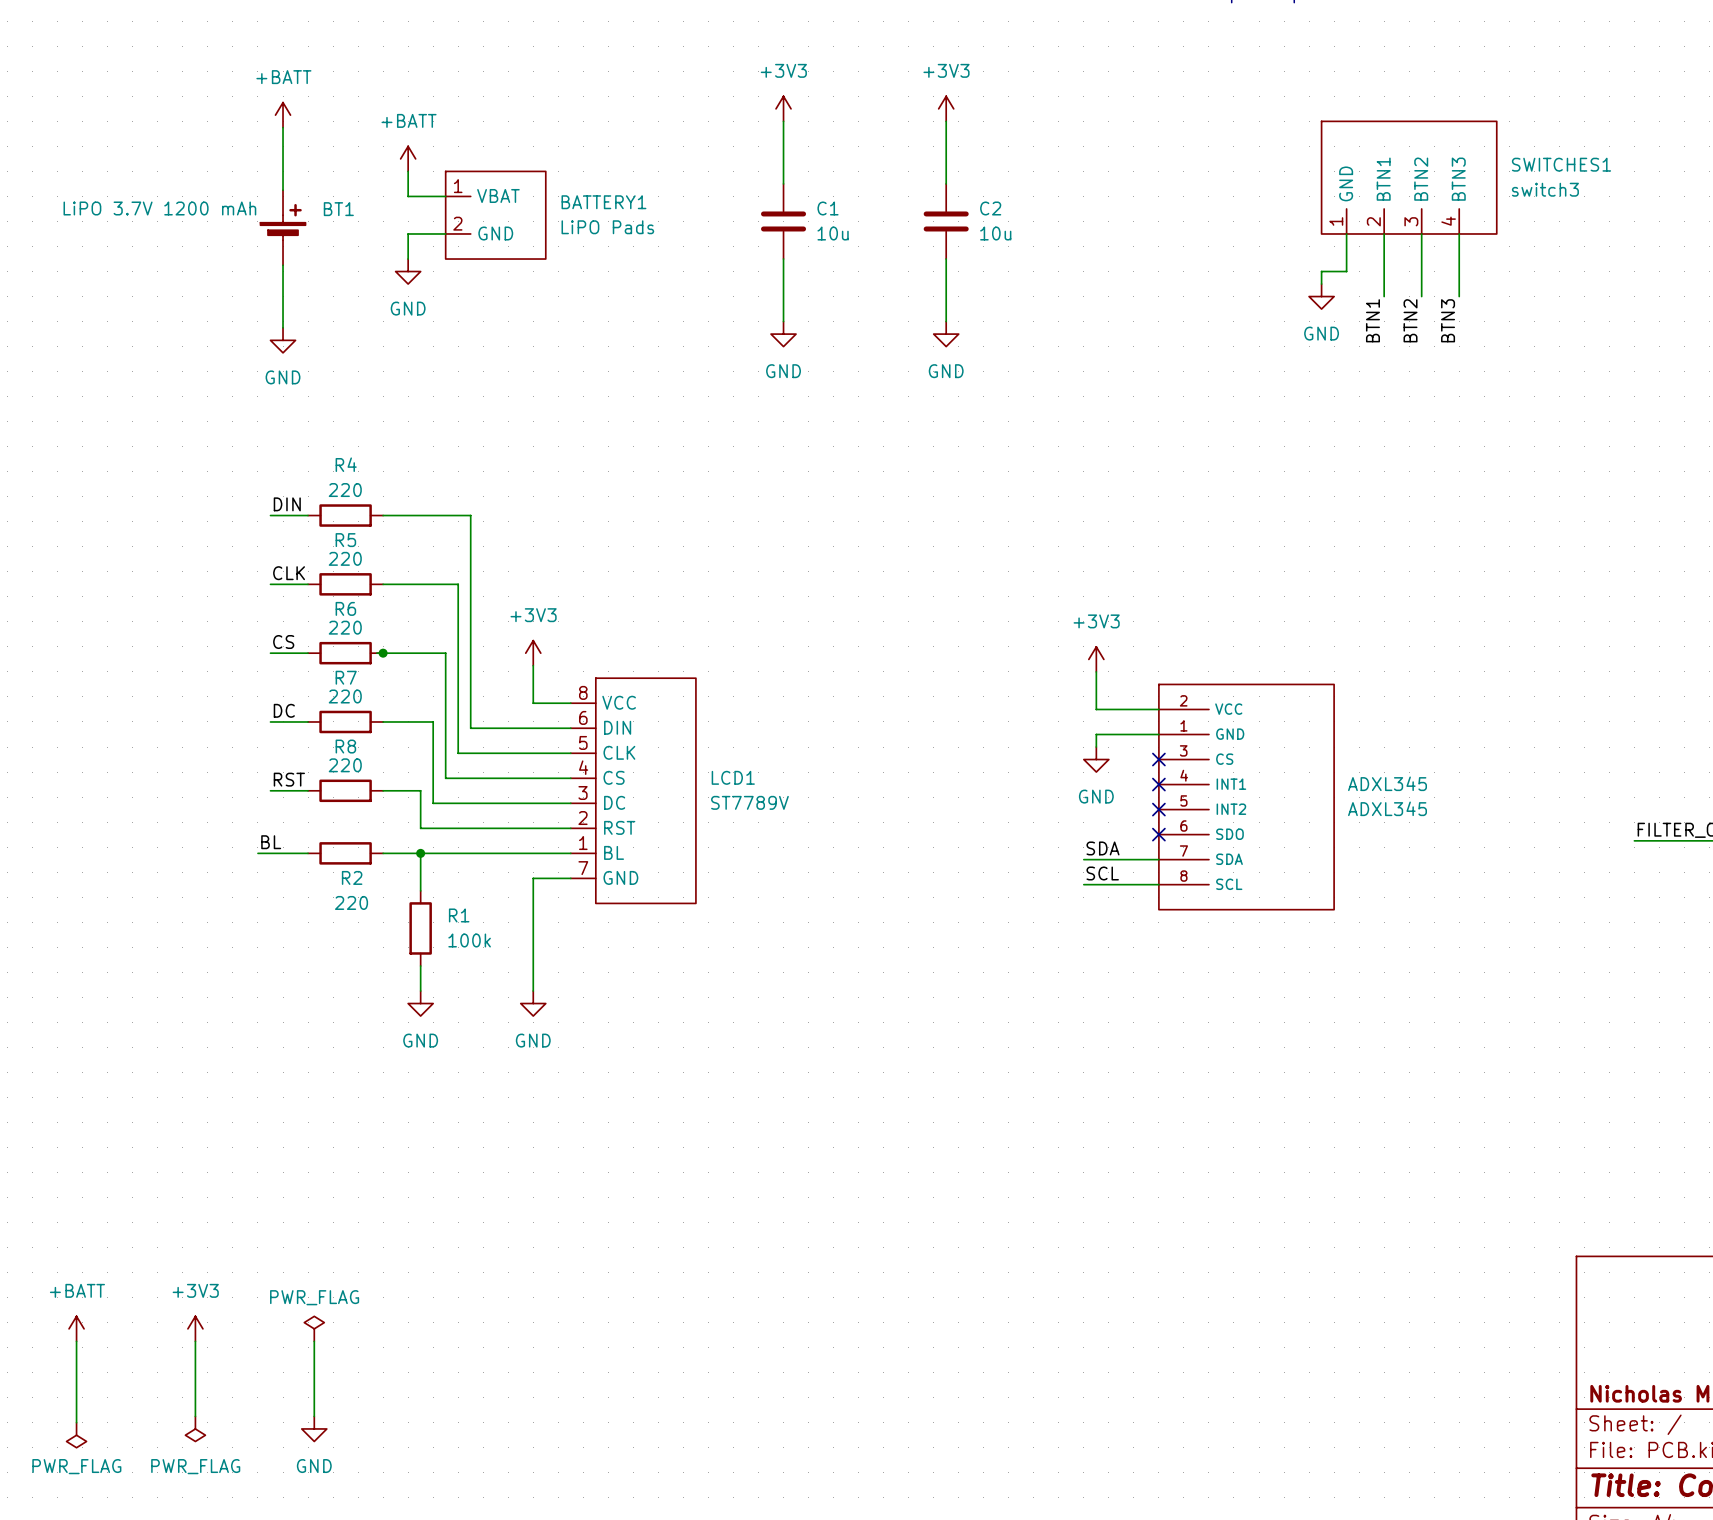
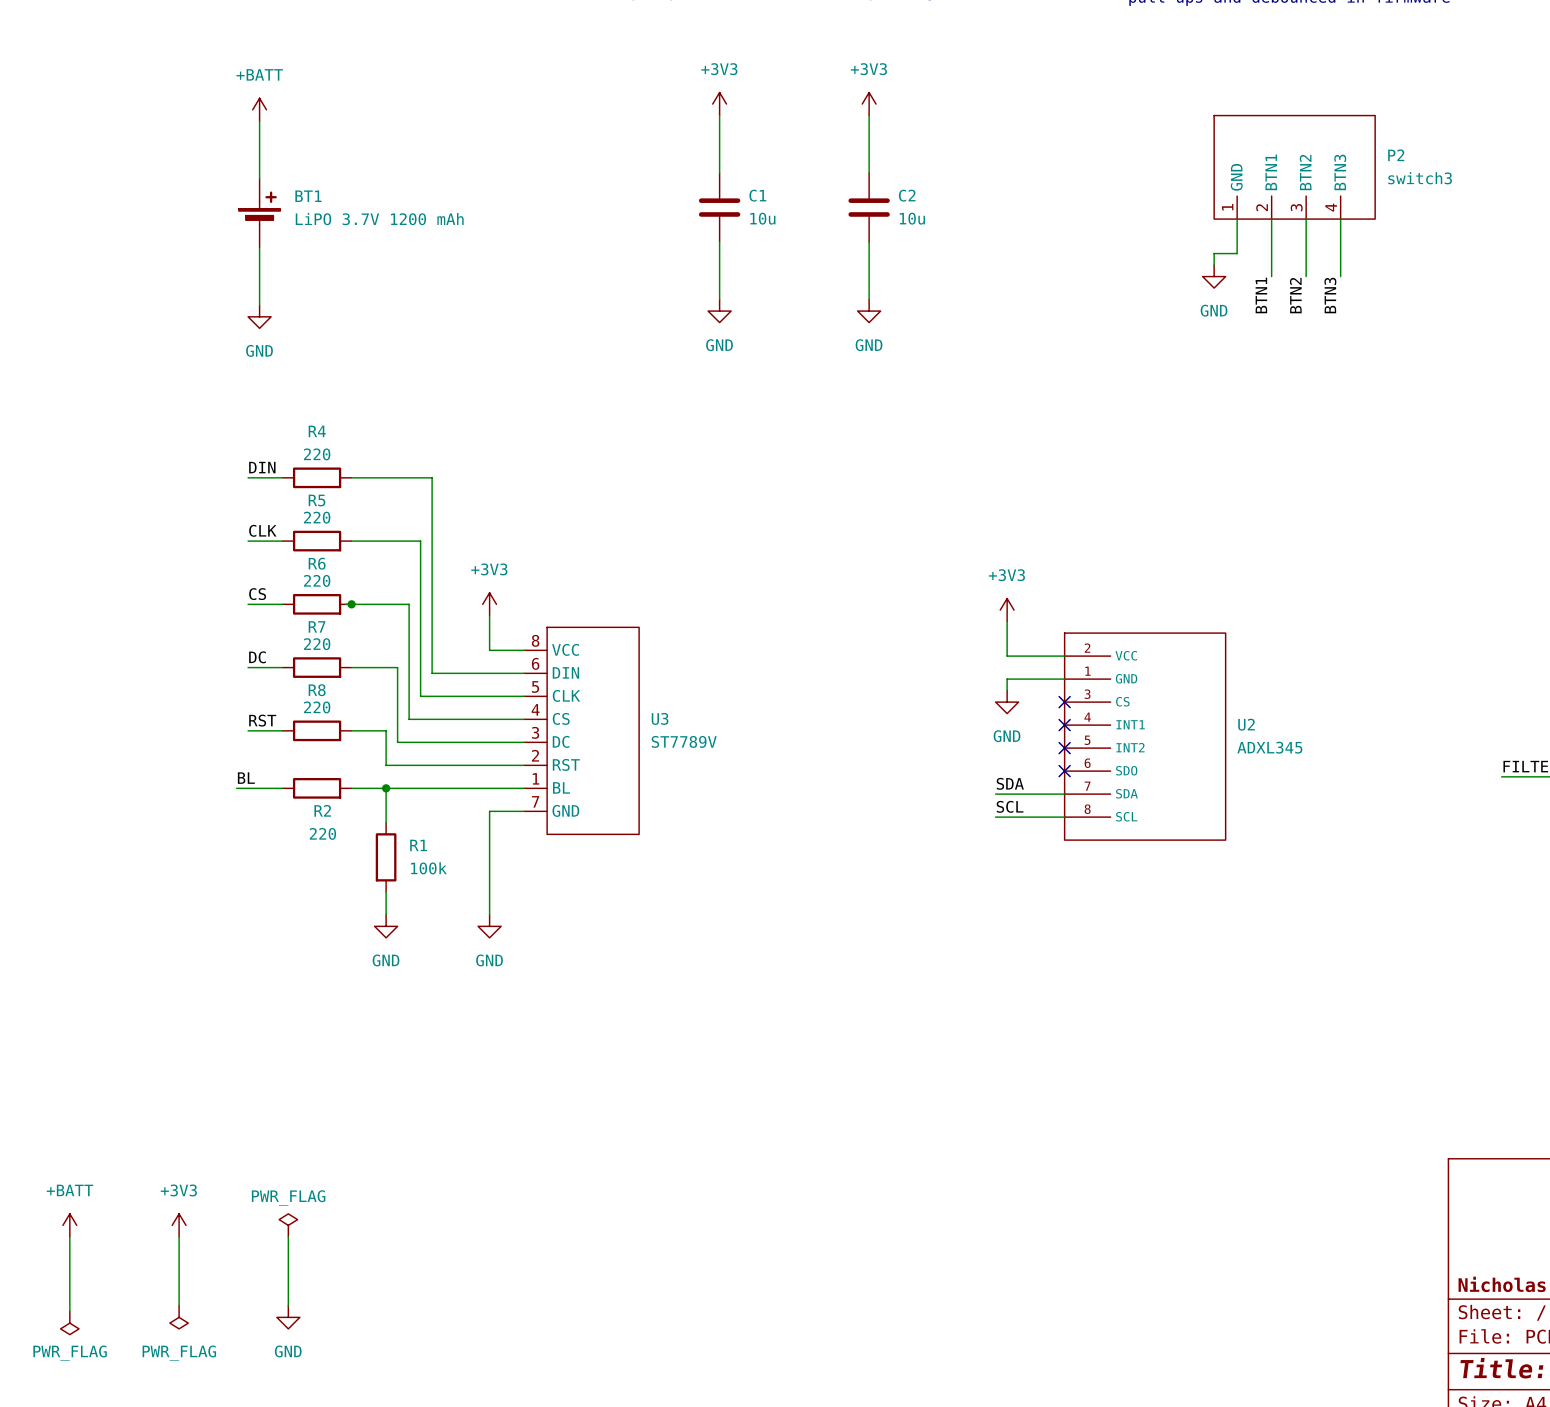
power symbol: +BATT (408, 158) -> none
SWITCHES1 name: SWITCHES1 (1561, 164) -> P2 (1396, 155)
wire: (408, 171) (408, 196) (445, 196) -> none
BT1 value position: LiPO 3.7V 1200 mAh (159, 208) -> LiPO 3.7V 1200 mAh (379, 219)
BATTERY1: LiPO Pads (495, 215) -> none
wire: (445, 233) (408, 233) (408, 259) -> none
power symbol: GND (408, 271) -> none
LCD1 name: LCD1 (733, 777) -> U3 (660, 718)
ADXL345 name: ADXL345 (1387, 783) -> U2 (1246, 724)

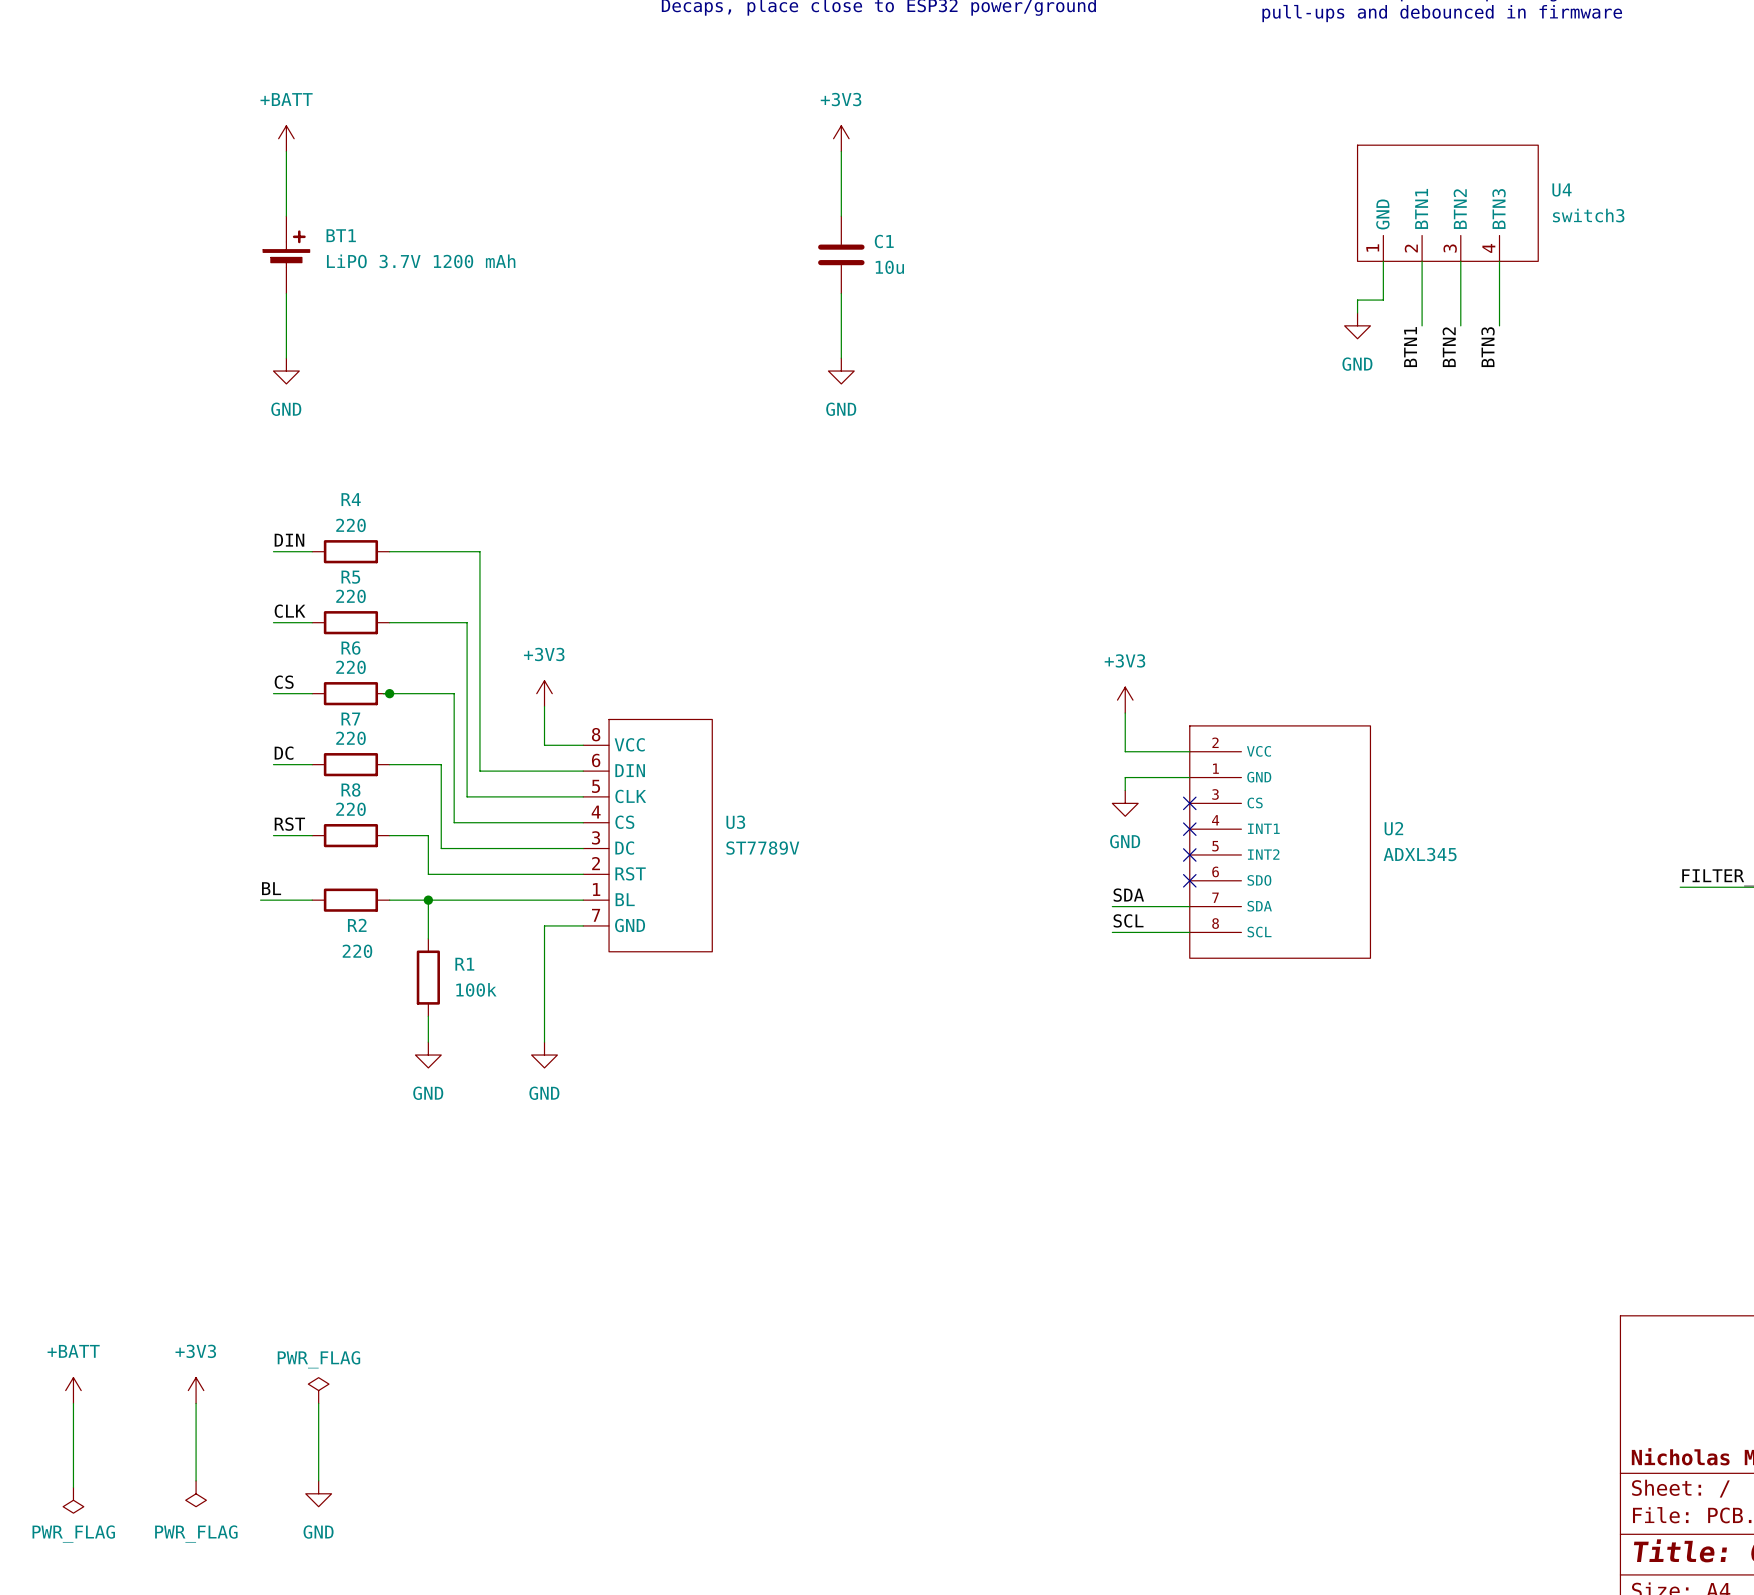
power symbol position: +3V3 (719, 104) -> +3V3 (841, 138)
power symbol: +3V3 (869, 104) -> none
wire: (719, 115) (719, 173) -> (841, 151) (841, 216)
wire: (869, 115) (869, 173) -> none
P2 name: P2 (1396, 155) -> U4 (1562, 189)
C1 position: (719, 207) -> (841, 254)
C2: 10u (869, 207) -> none
wire: (719, 242) (719, 299) -> (841, 293) (841, 358)
wire: (869, 242) (869, 299) -> none
power symbol position: GND (719, 311) -> GND (841, 371)
power symbol: GND (869, 311) -> none

